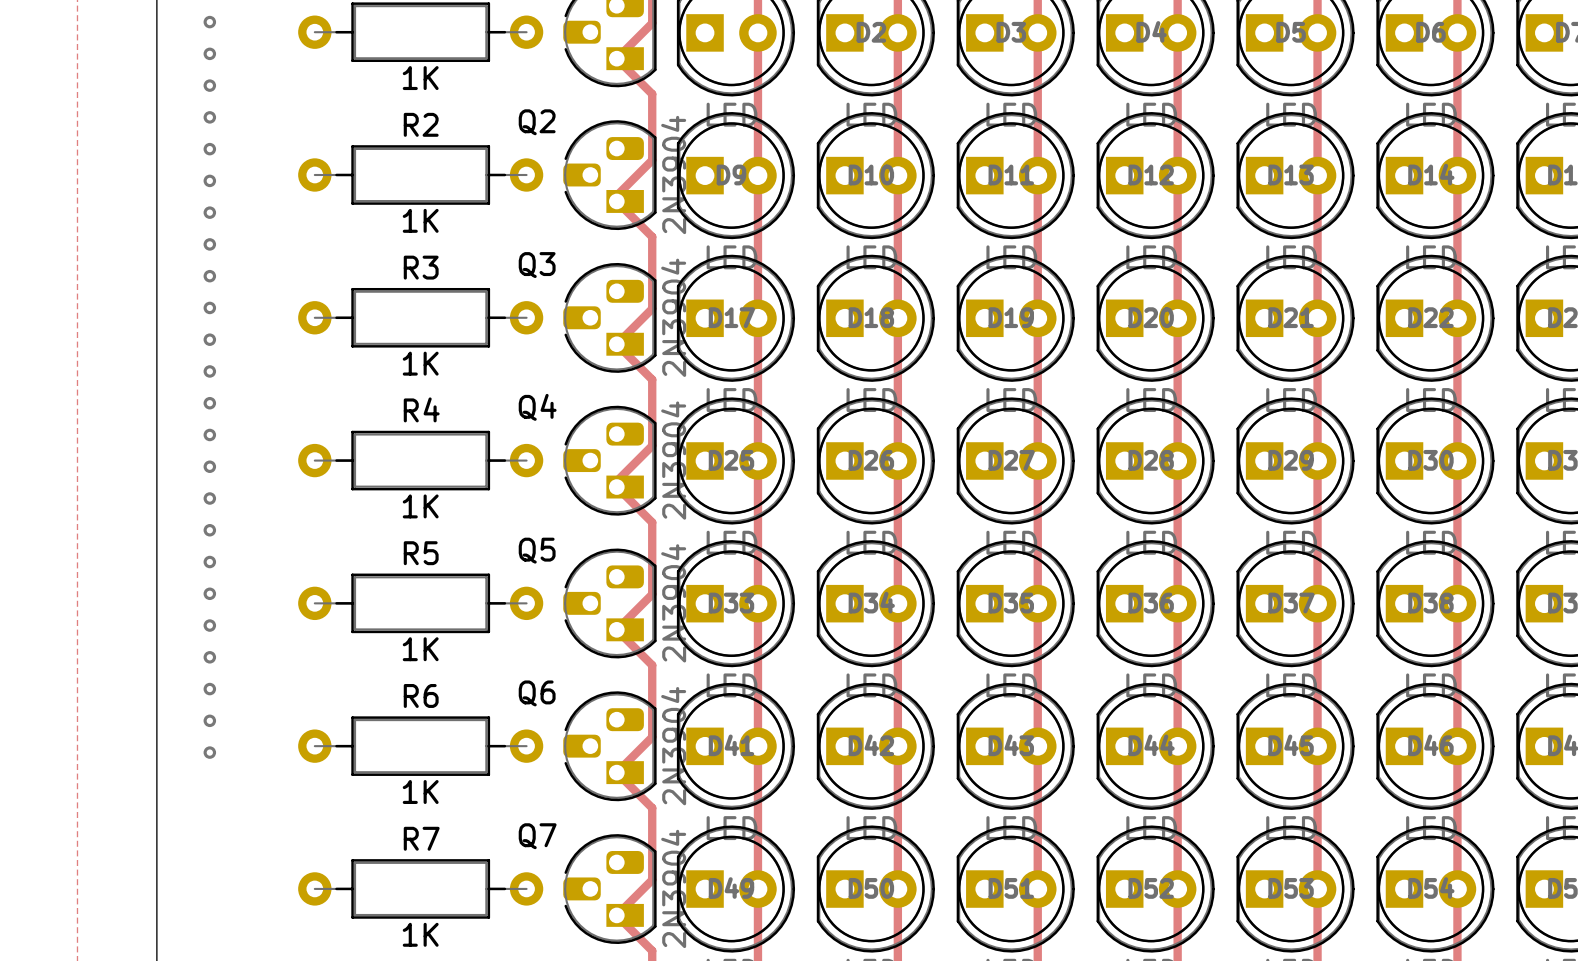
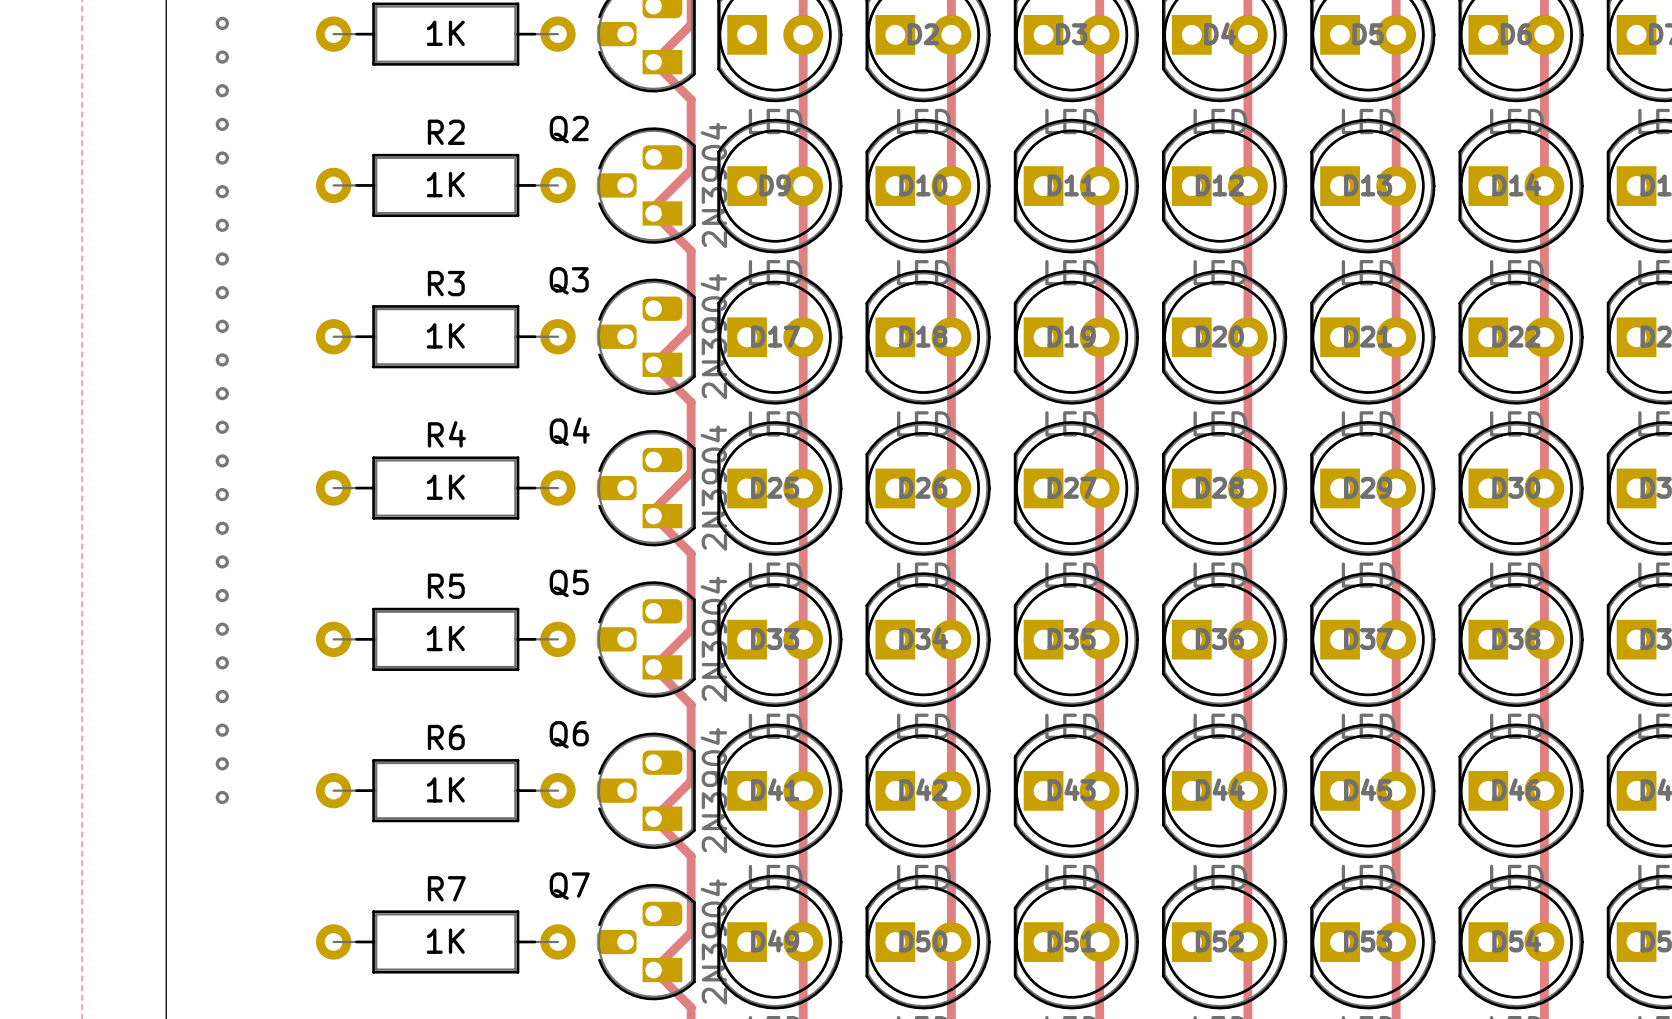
part value position: 1K (420, 78) -> 1K (445, 33)
R2 value position: 1K (420, 220) -> 1K (445, 184)
R3 value position: 1K (420, 363) -> 1K (445, 335)
R4 value position: 1K (420, 506) -> 1K (445, 487)
R5 value position: 1K (420, 649) -> 1K (445, 638)
R6 value position: 1K (420, 792) -> 1K (445, 789)
R7 value position: 1K (420, 934) -> 1K (445, 941)

